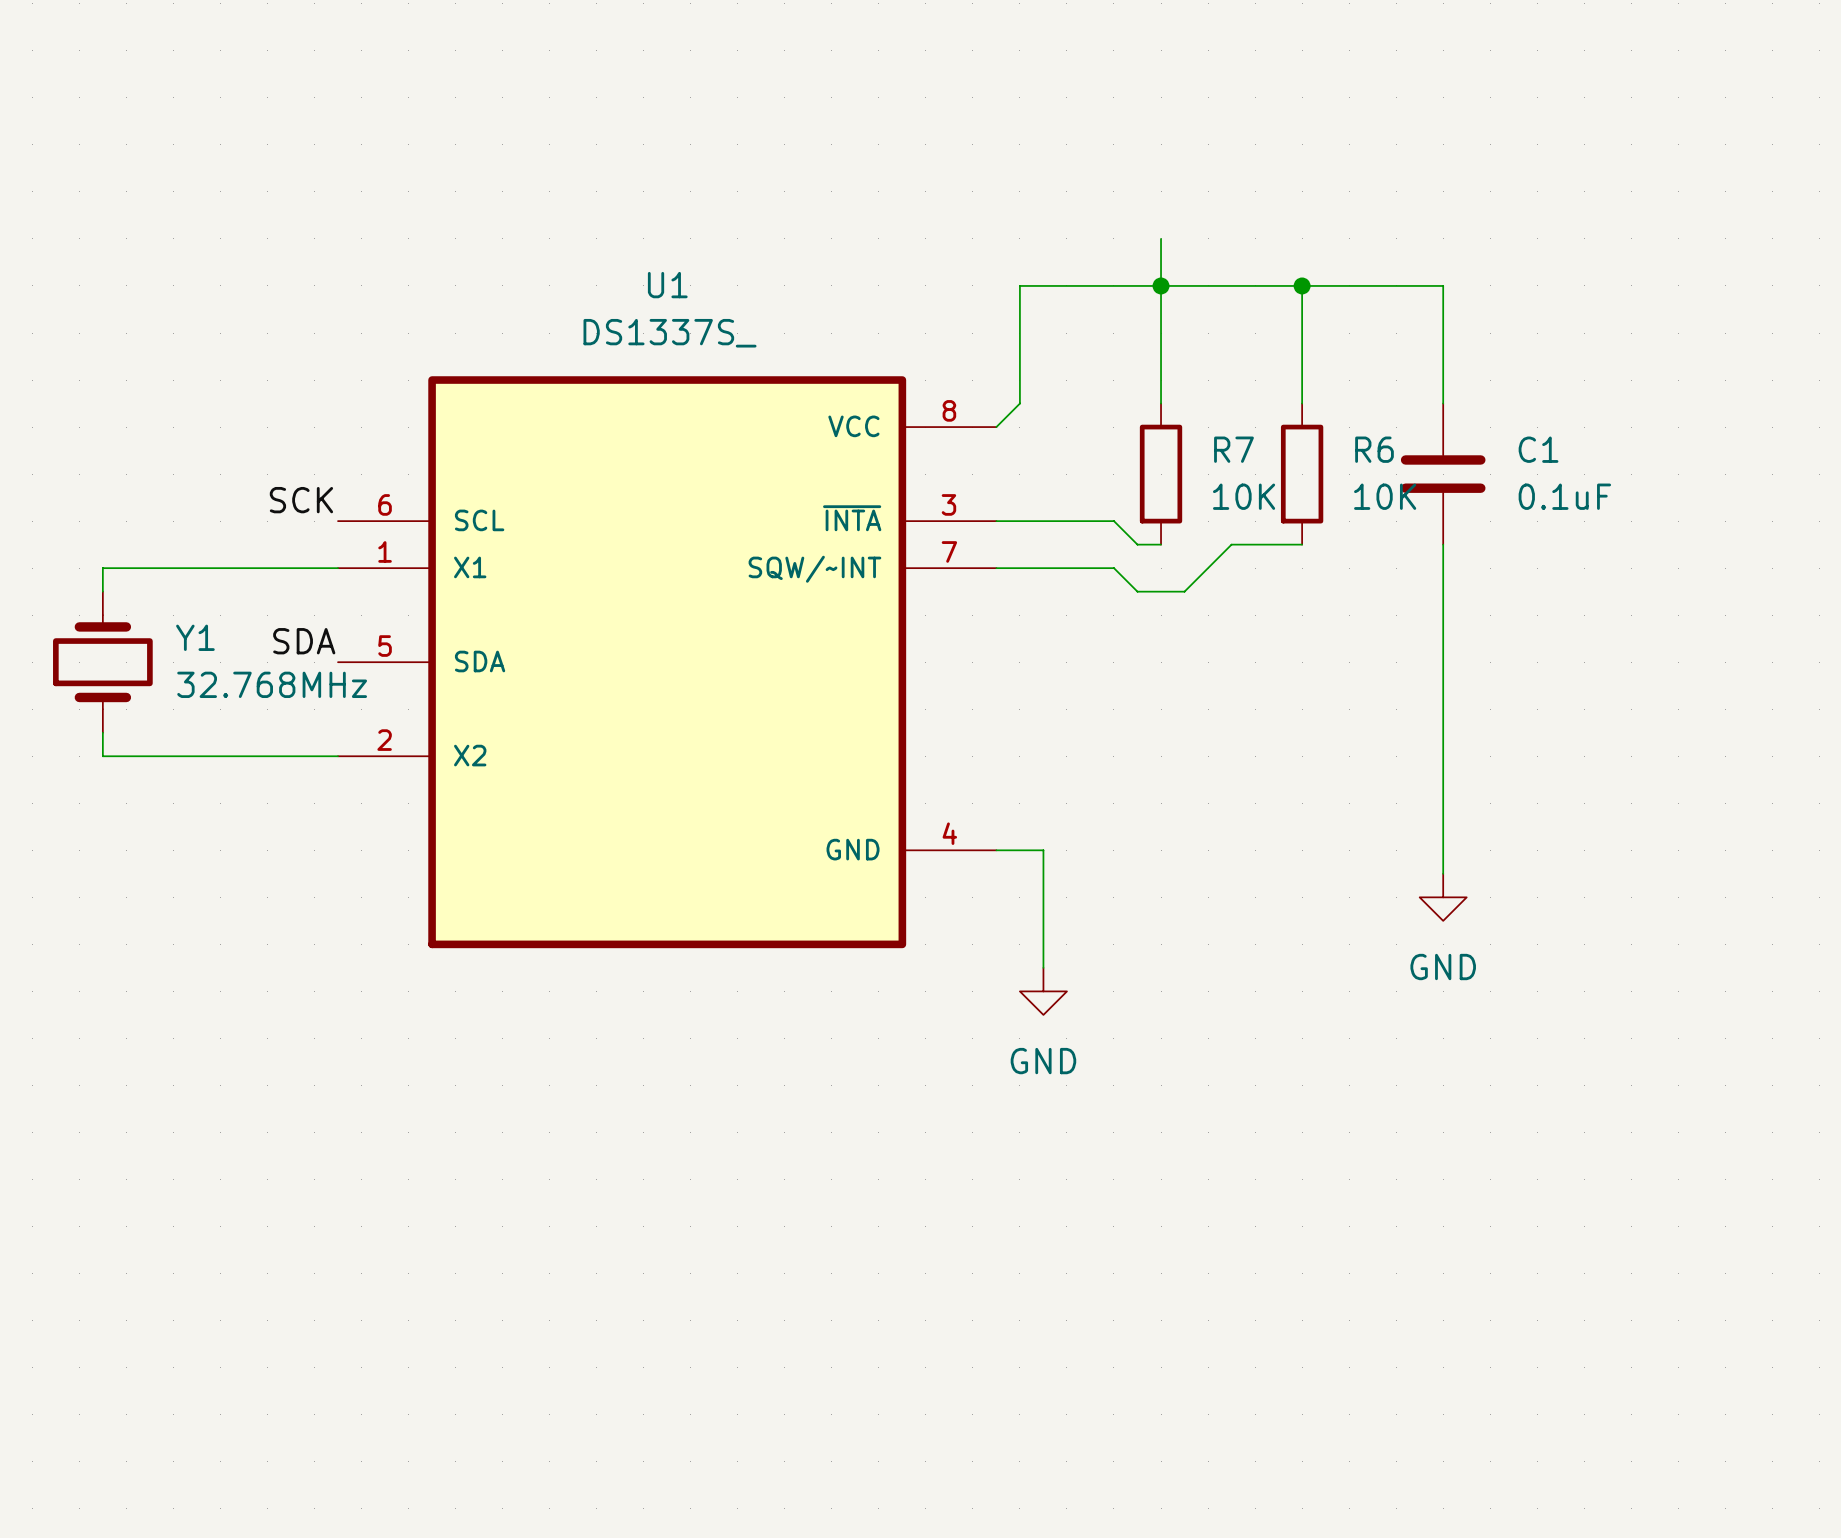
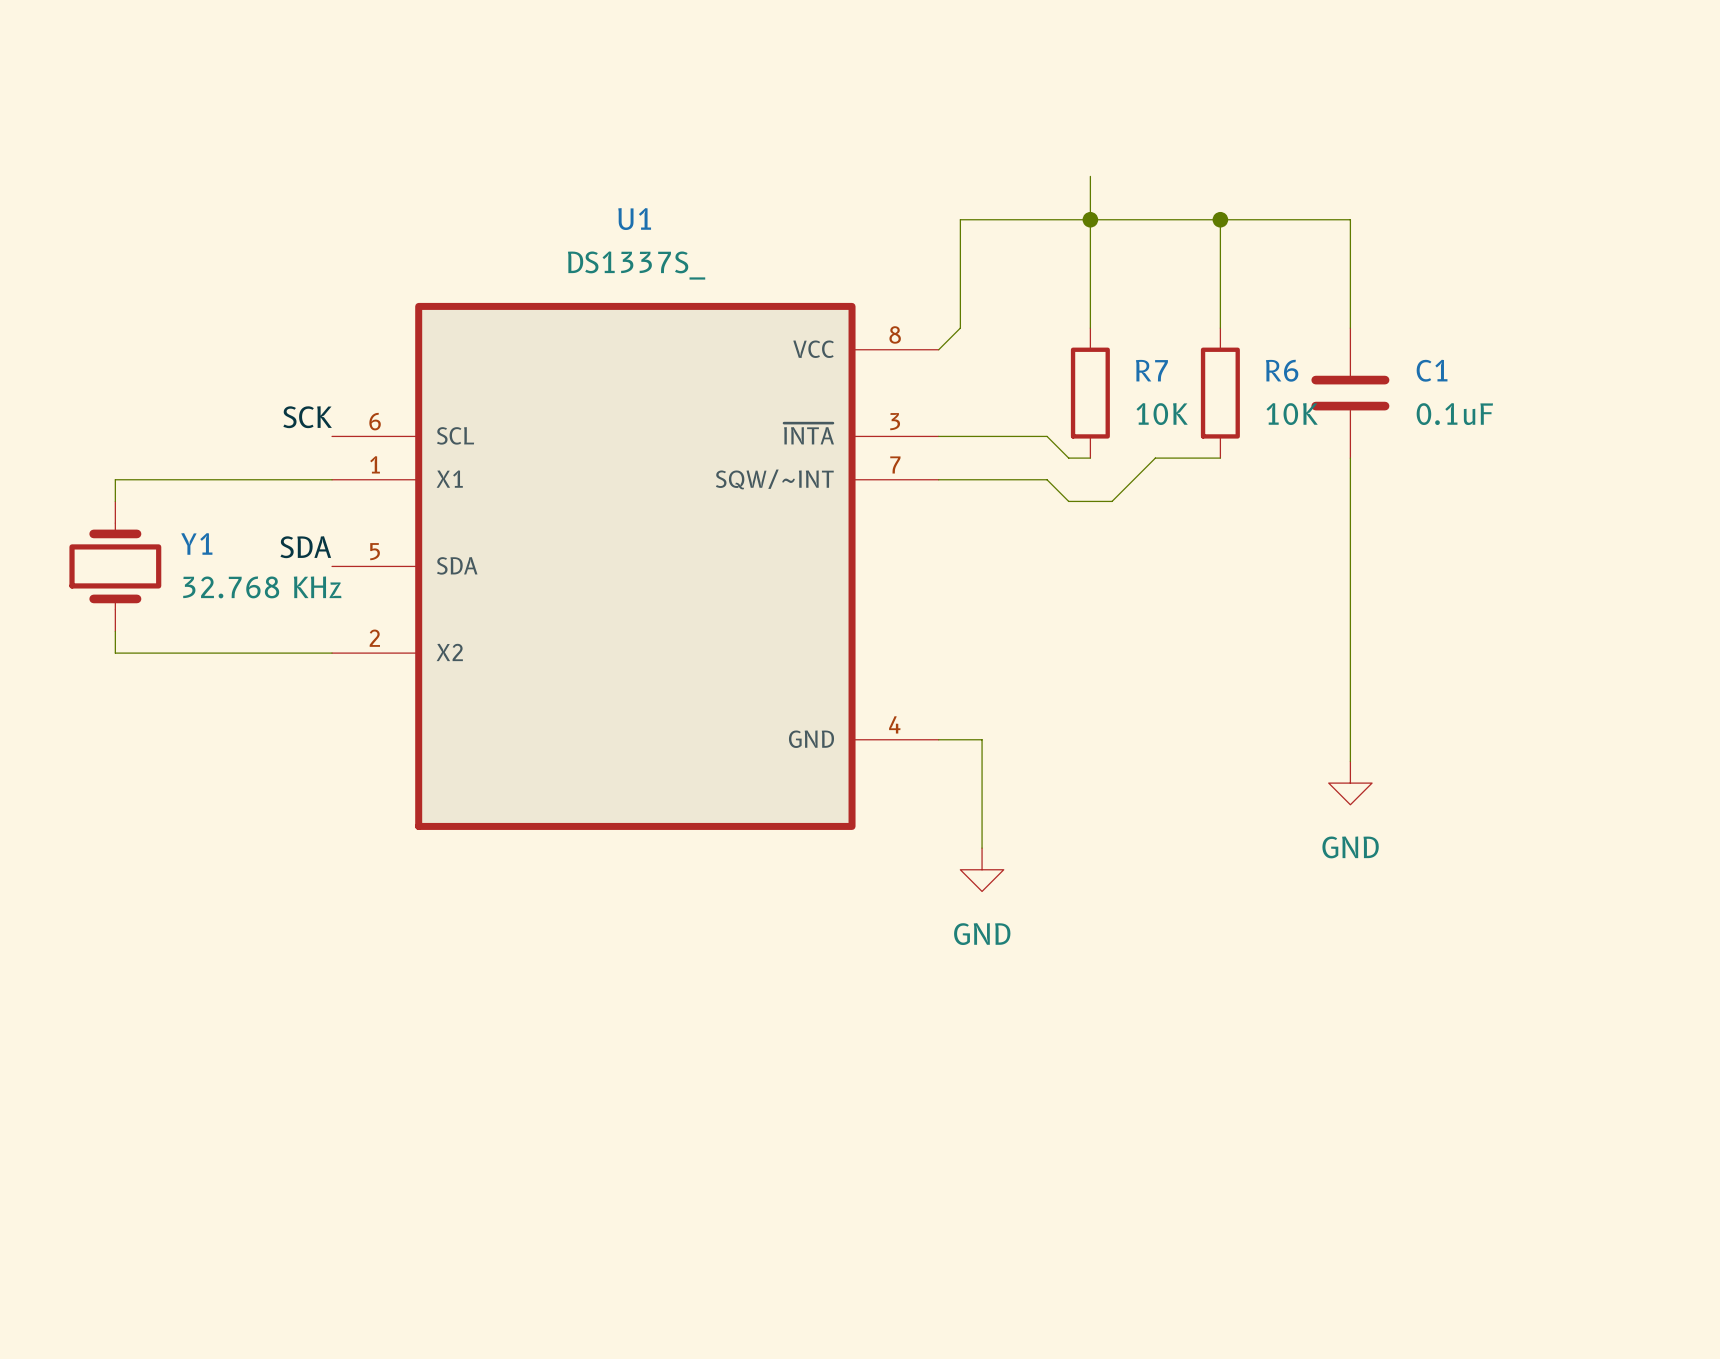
Y1 value: 32.768MHz (272, 684) -> 32.768 KHz (262, 587)

